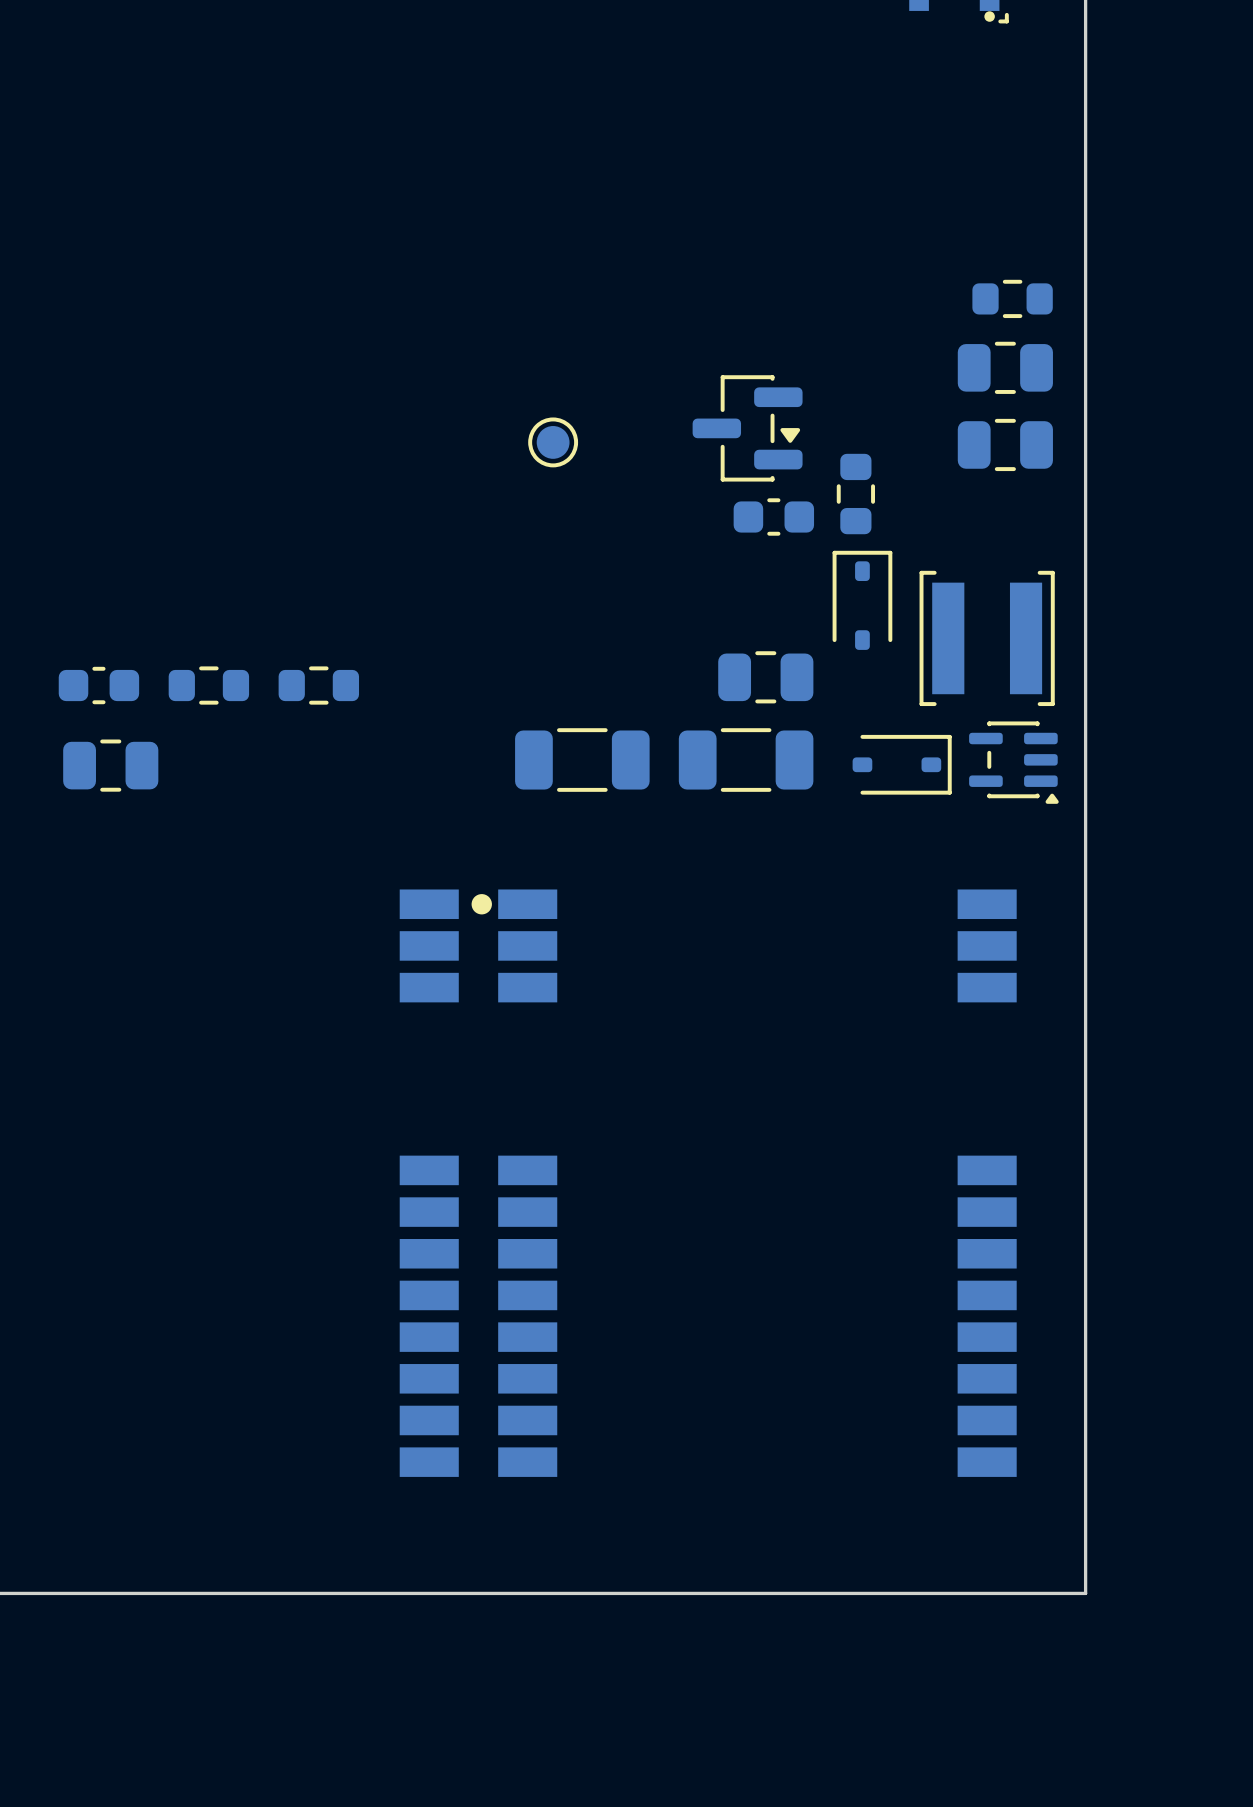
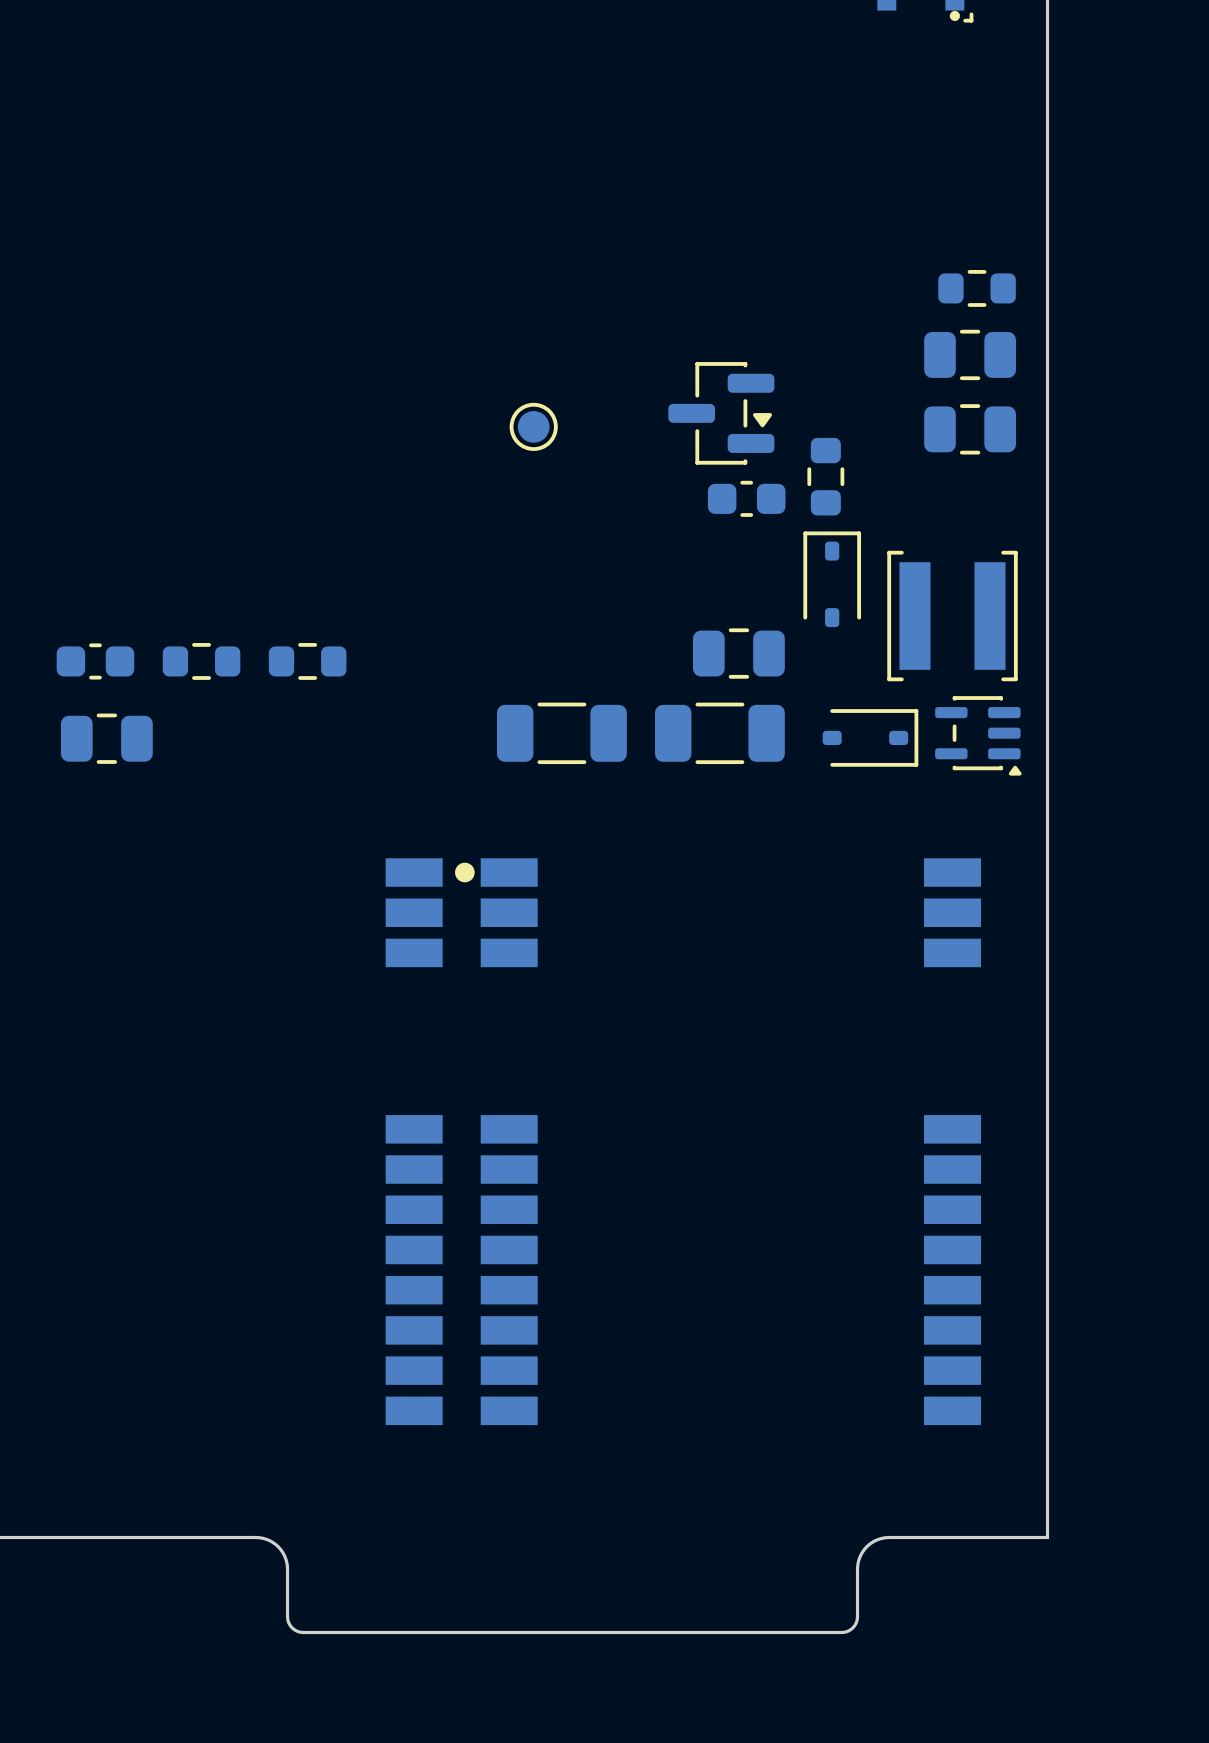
board edge: (921, 1593) (265, 1593) -> (889, 1537) (873, 1541) (861, 1553) (857, 1565) (856, 1620) (851, 1629) (841, 1632) (301, 1632) (293, 1629) (288, 1620) (287, 1565) (284, 1555) (272, 1542) (255, 1537)

